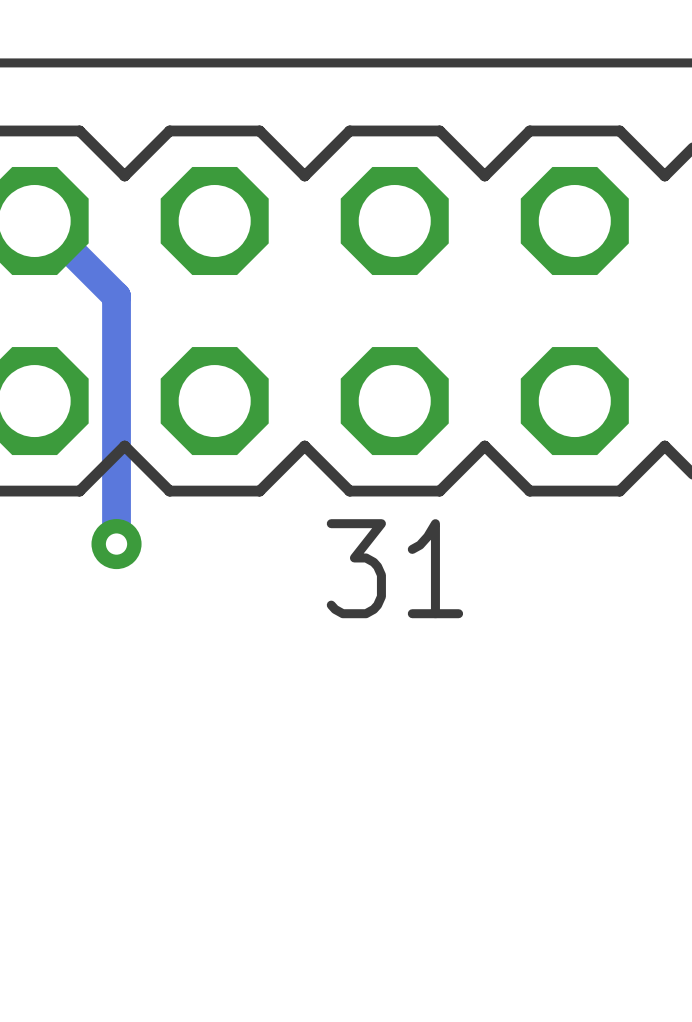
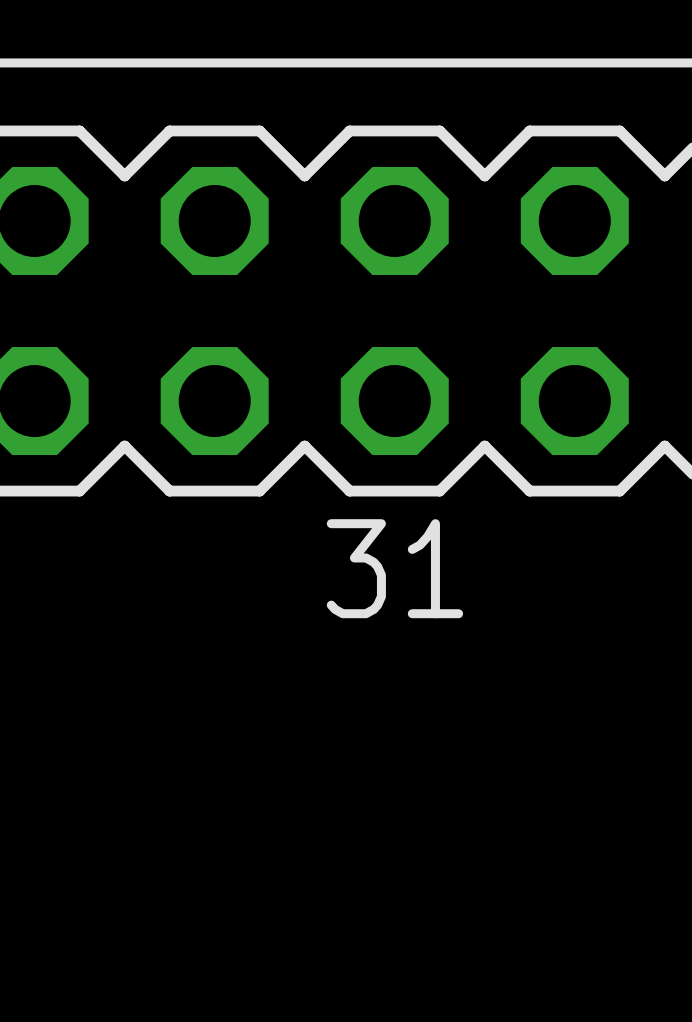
track: (34, 220) (41, 220) (116, 296) (116, 544) -> none
via: (116, 544) -> none

